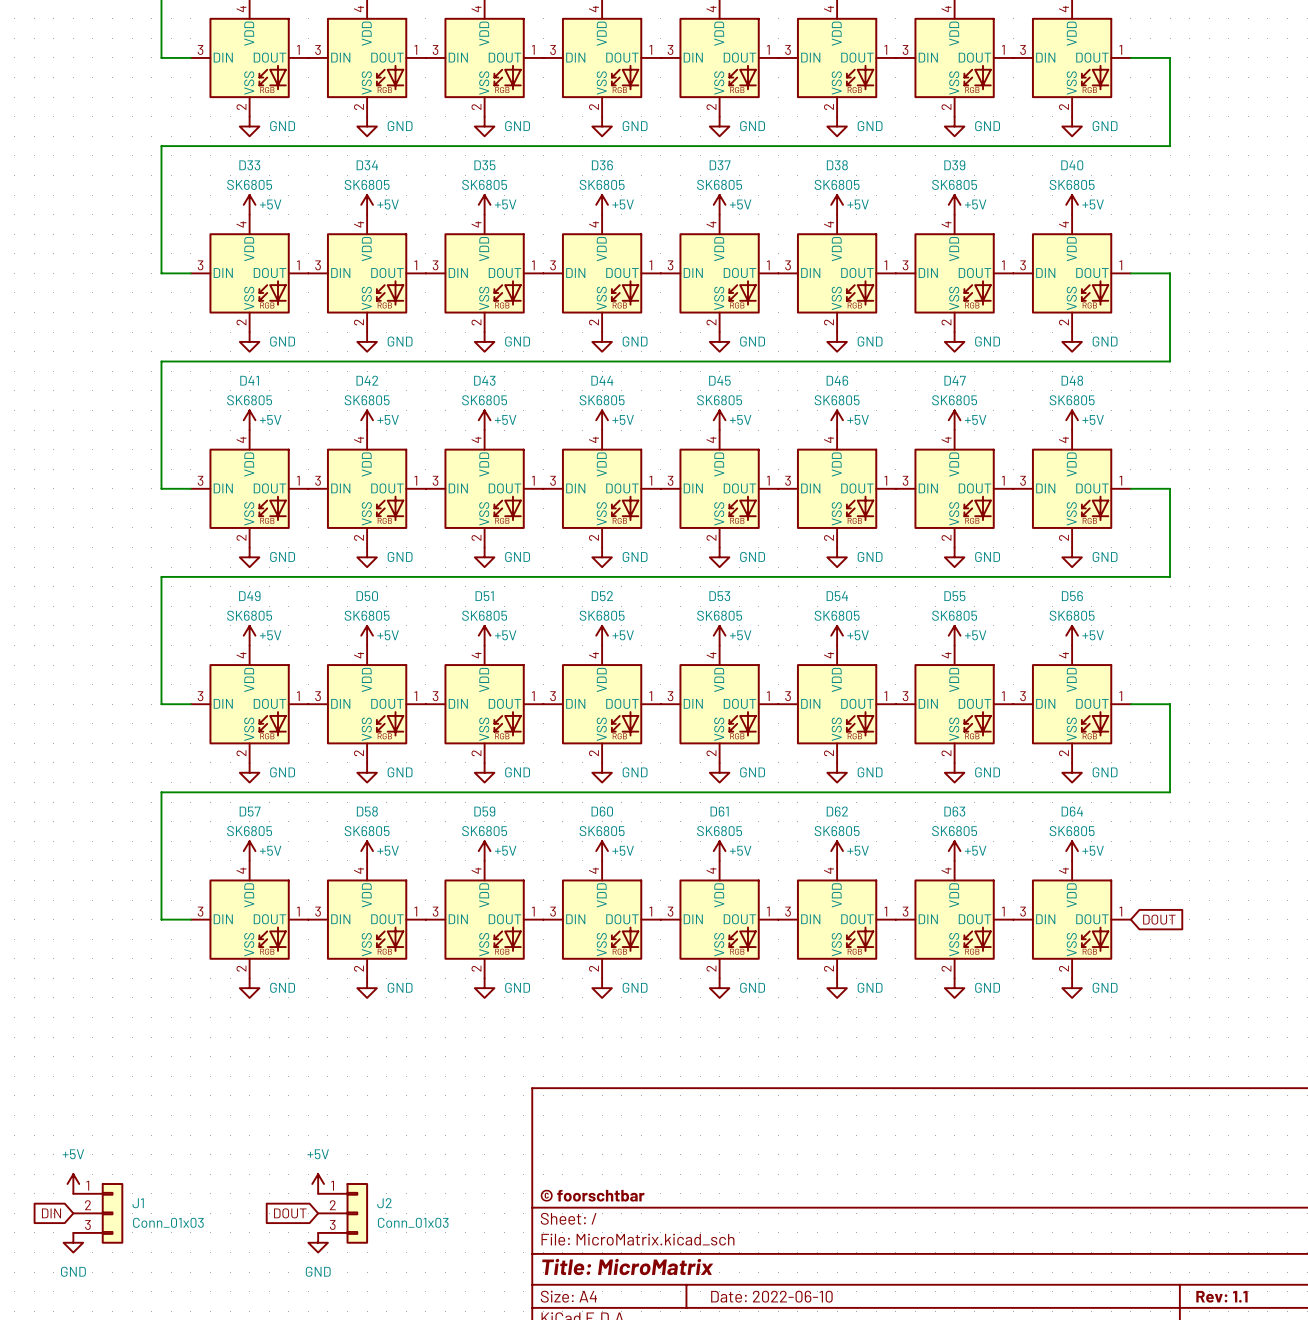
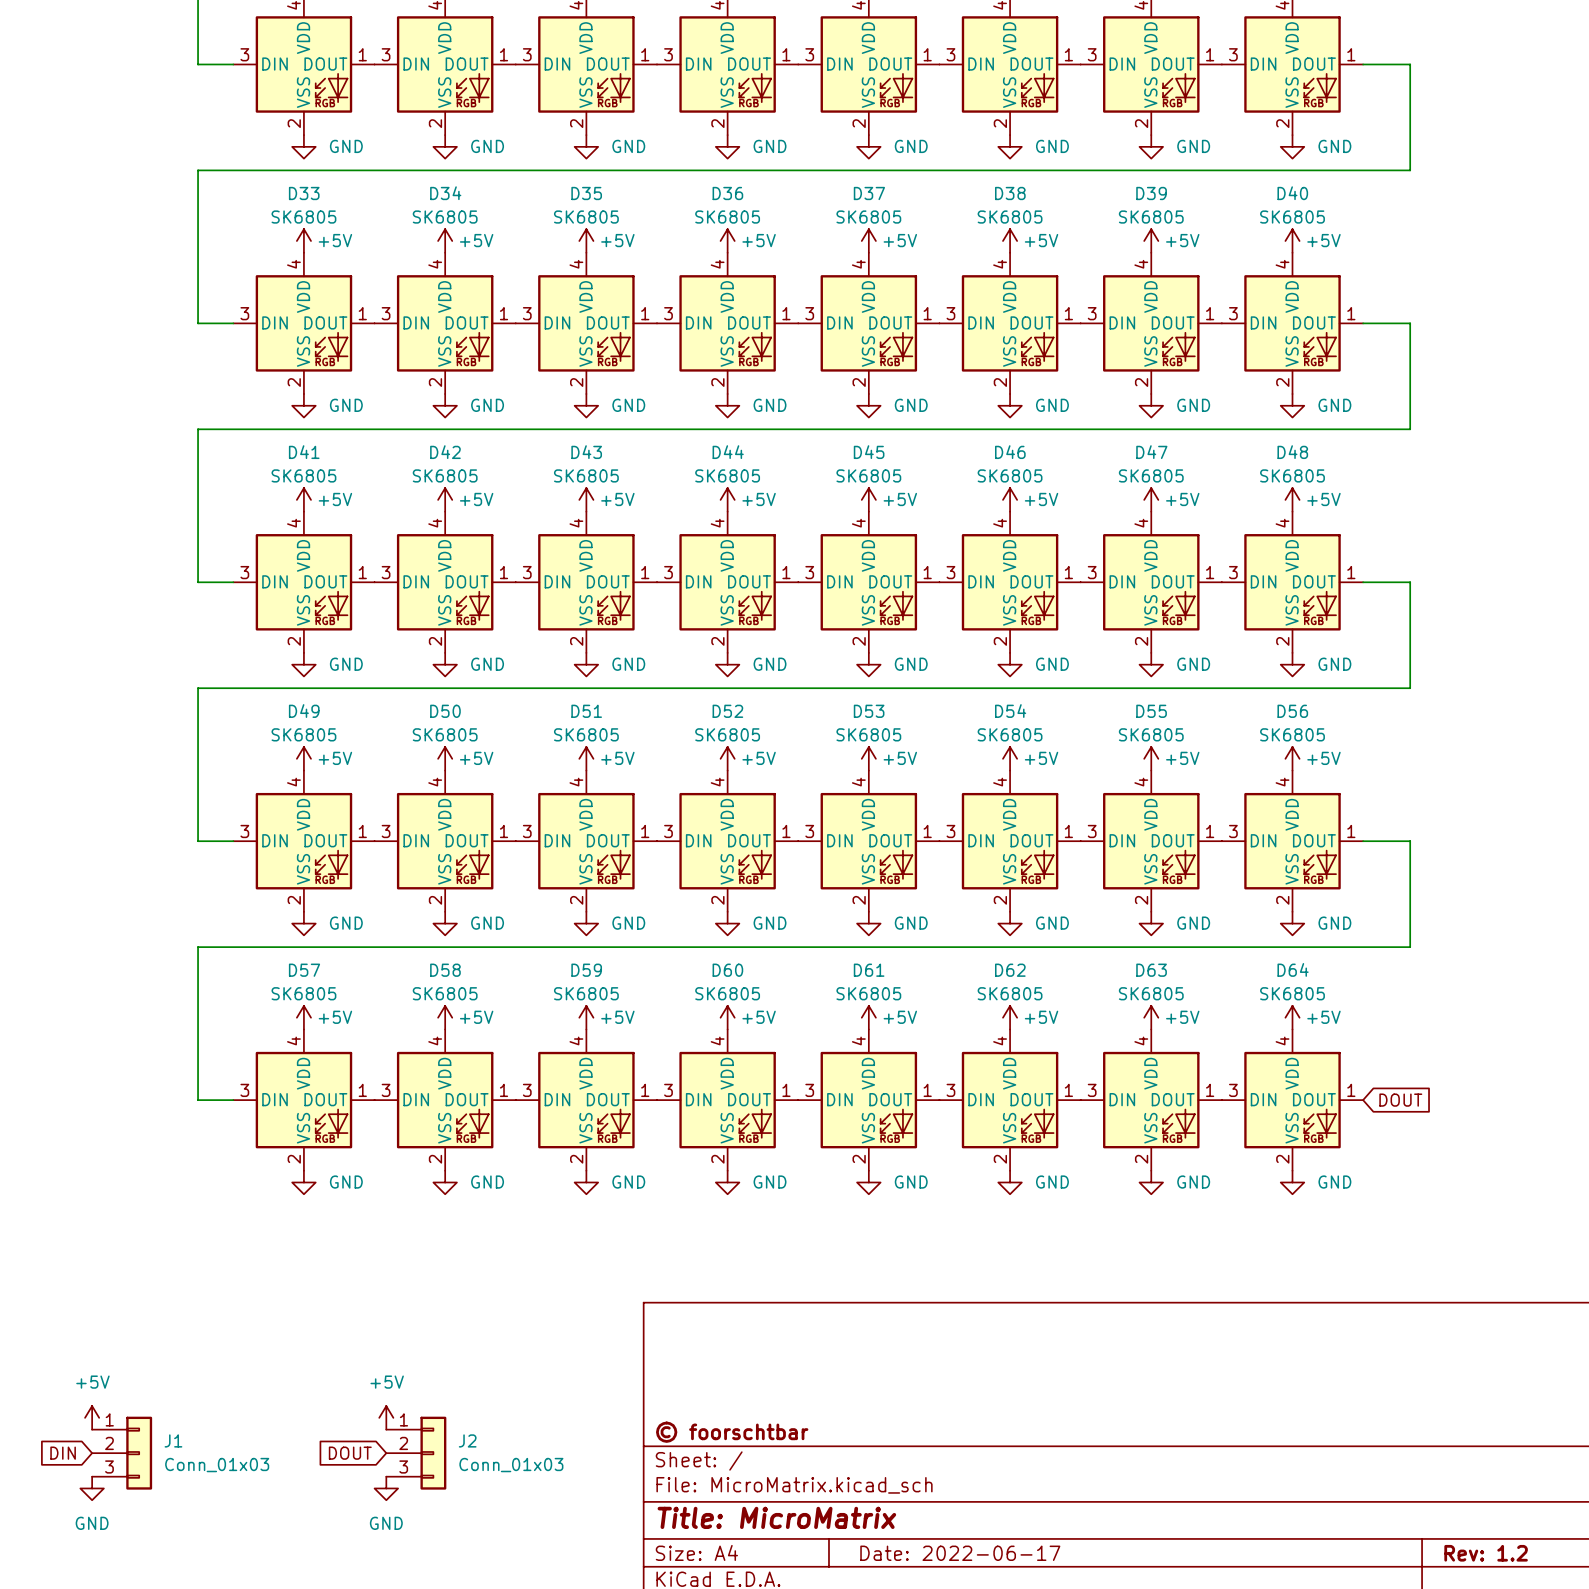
title block: Date: 2022-06-10 (771, 1296) -> Date: 2022-06-17 (960, 1553)
title block: Rev: 1.1 (1221, 1296) -> Rev: 1.2 (1486, 1553)

